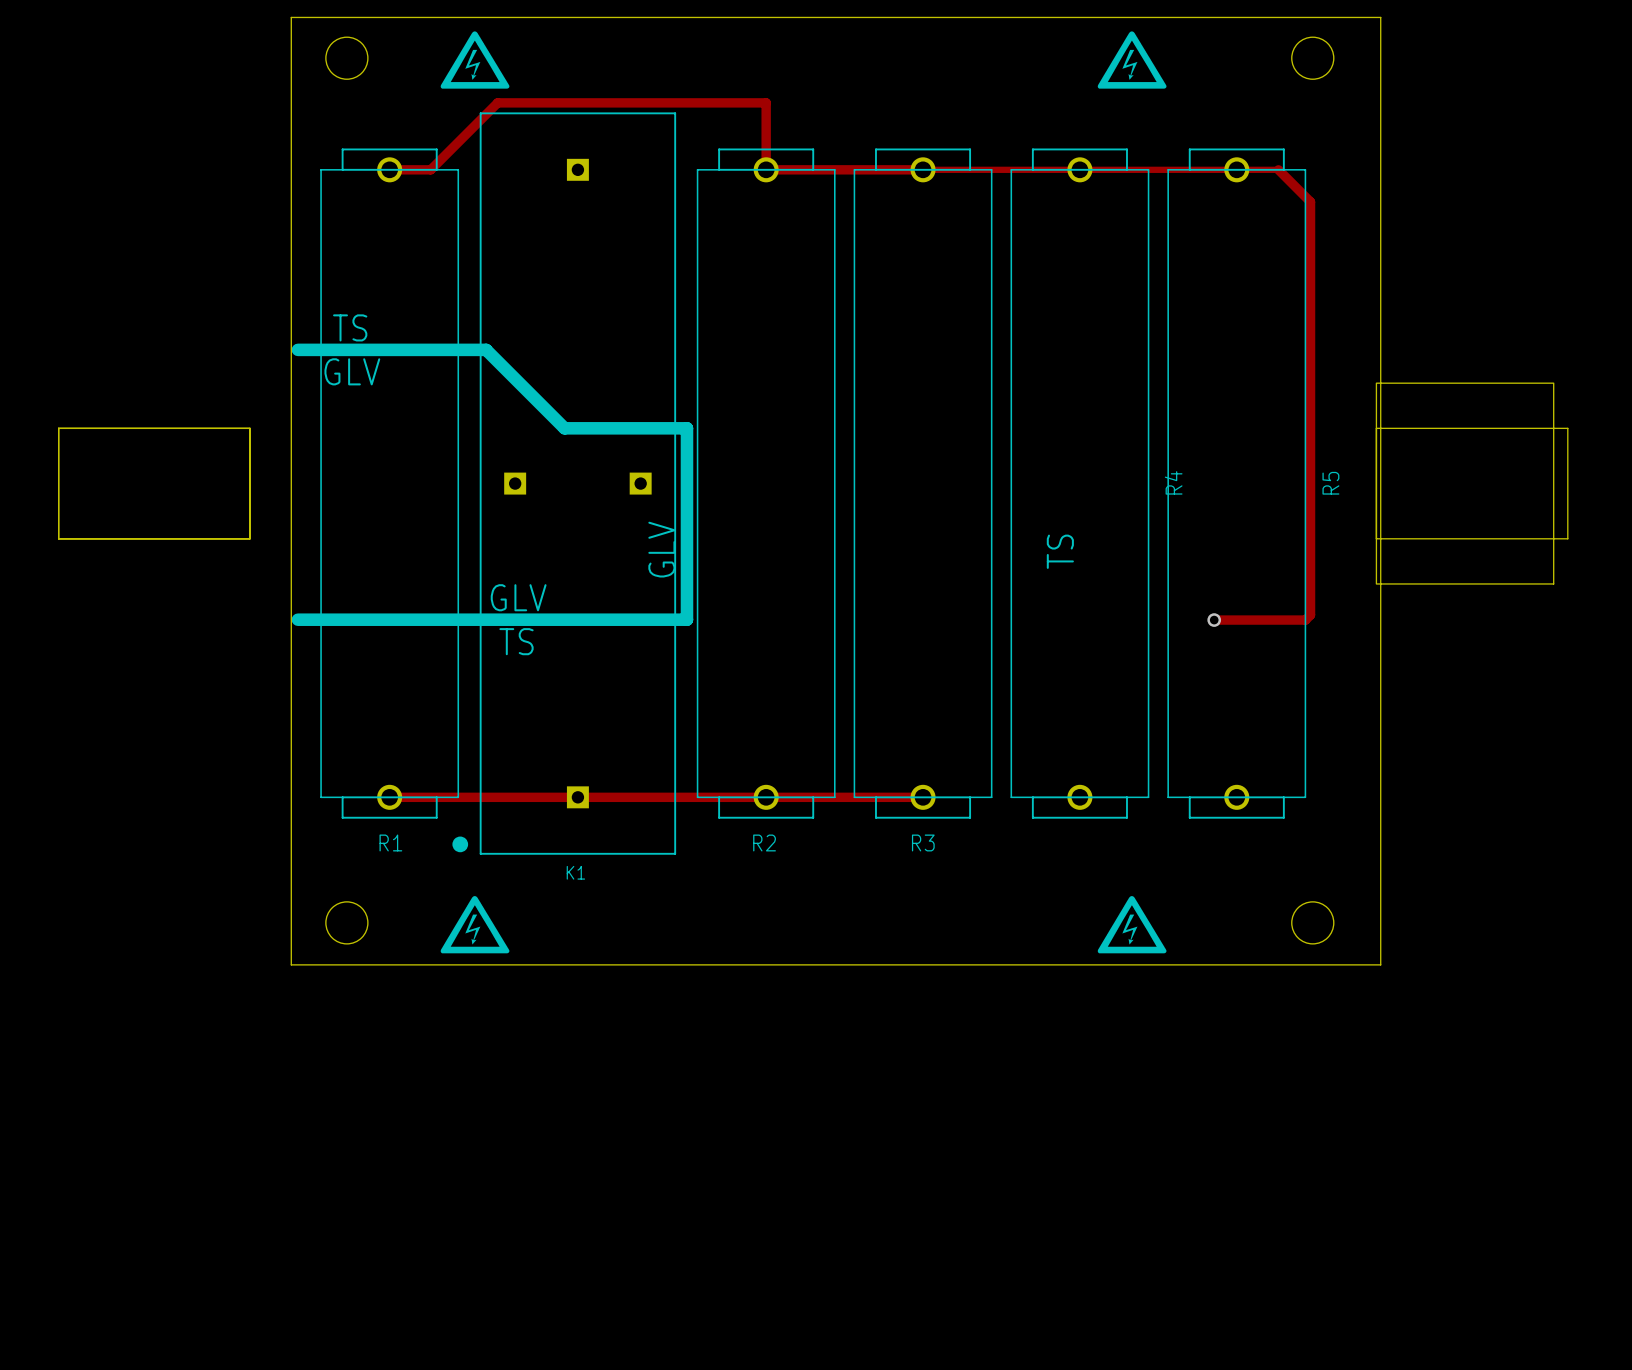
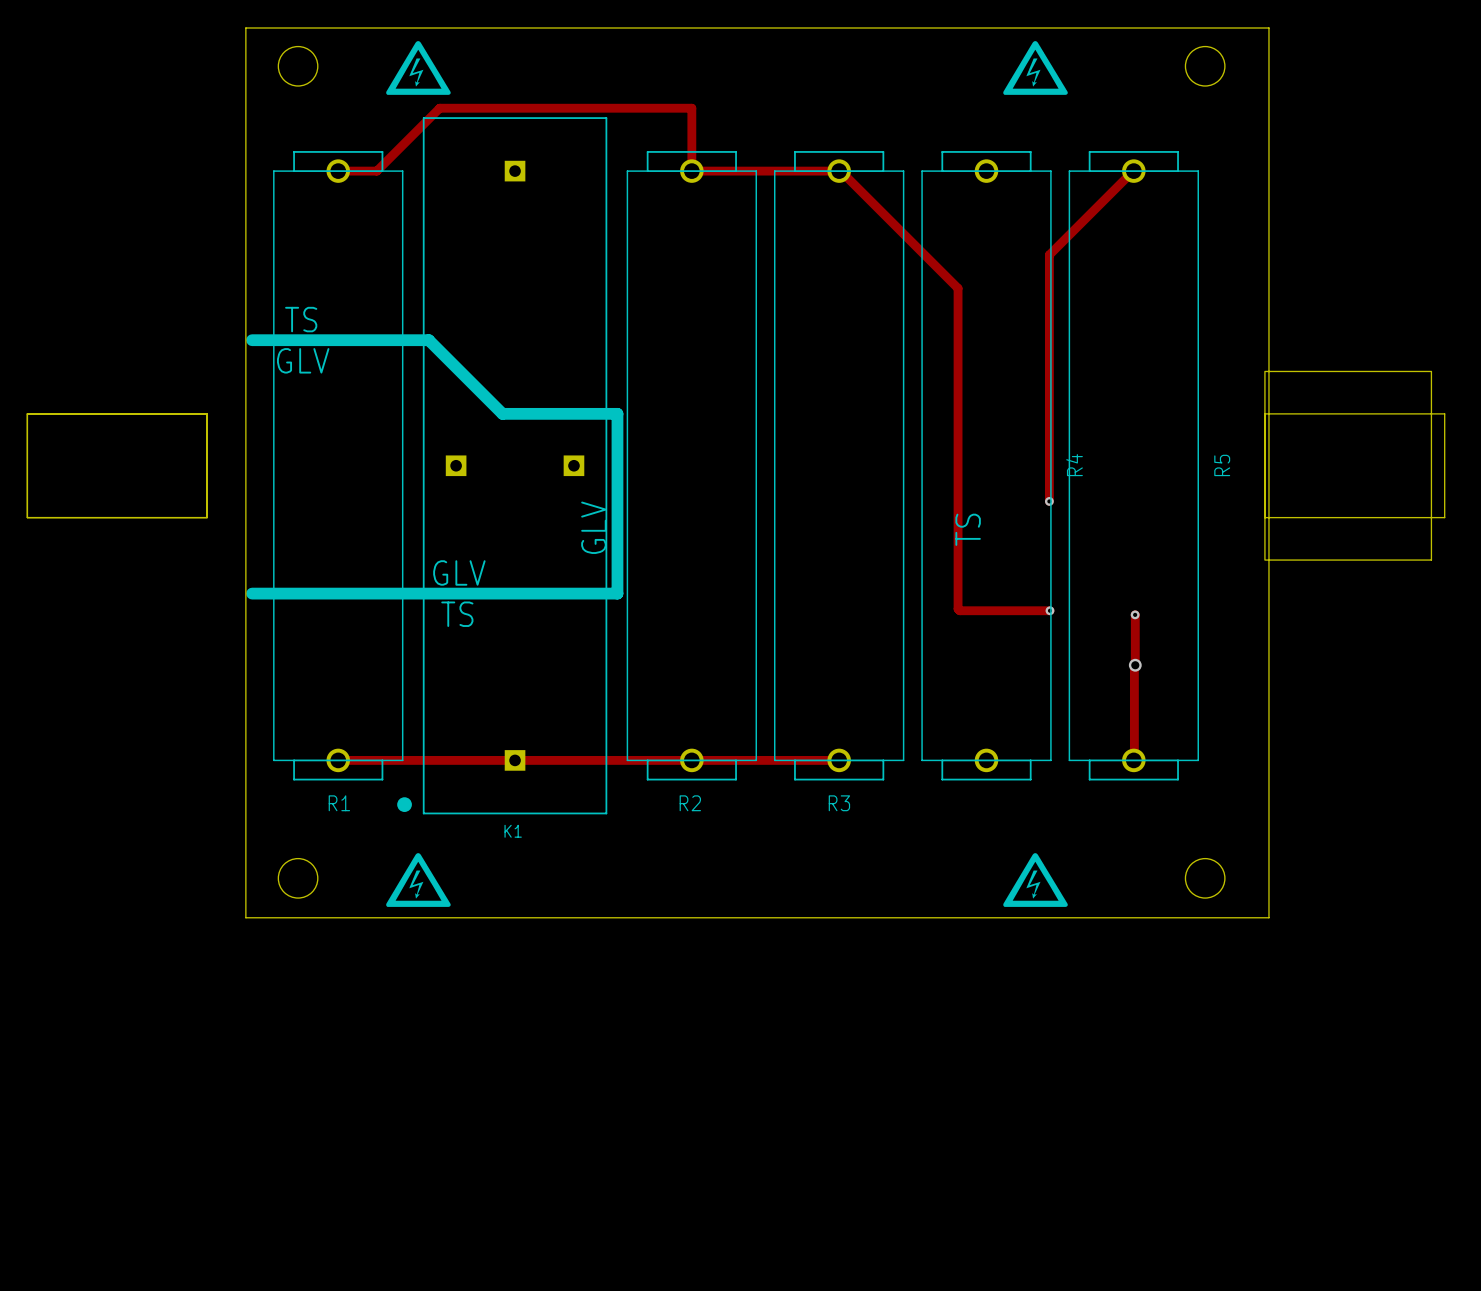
track: none -> (1134, 169) (1049, 254) (1049, 501)
track: none -> (840, 171) (958, 288) (958, 608) (959, 610) (1049, 610)
track: (930, 169) (1278, 169) (1310, 201) (1310, 614) (1305, 620) (1214, 620) -> none
via: none -> (1049, 501)
via: (1214, 620) -> none
via: none -> (1049, 610)
track: none -> (1135, 615) (1134, 759)
via: none -> (1135, 614)
via: none -> (1135, 665)

